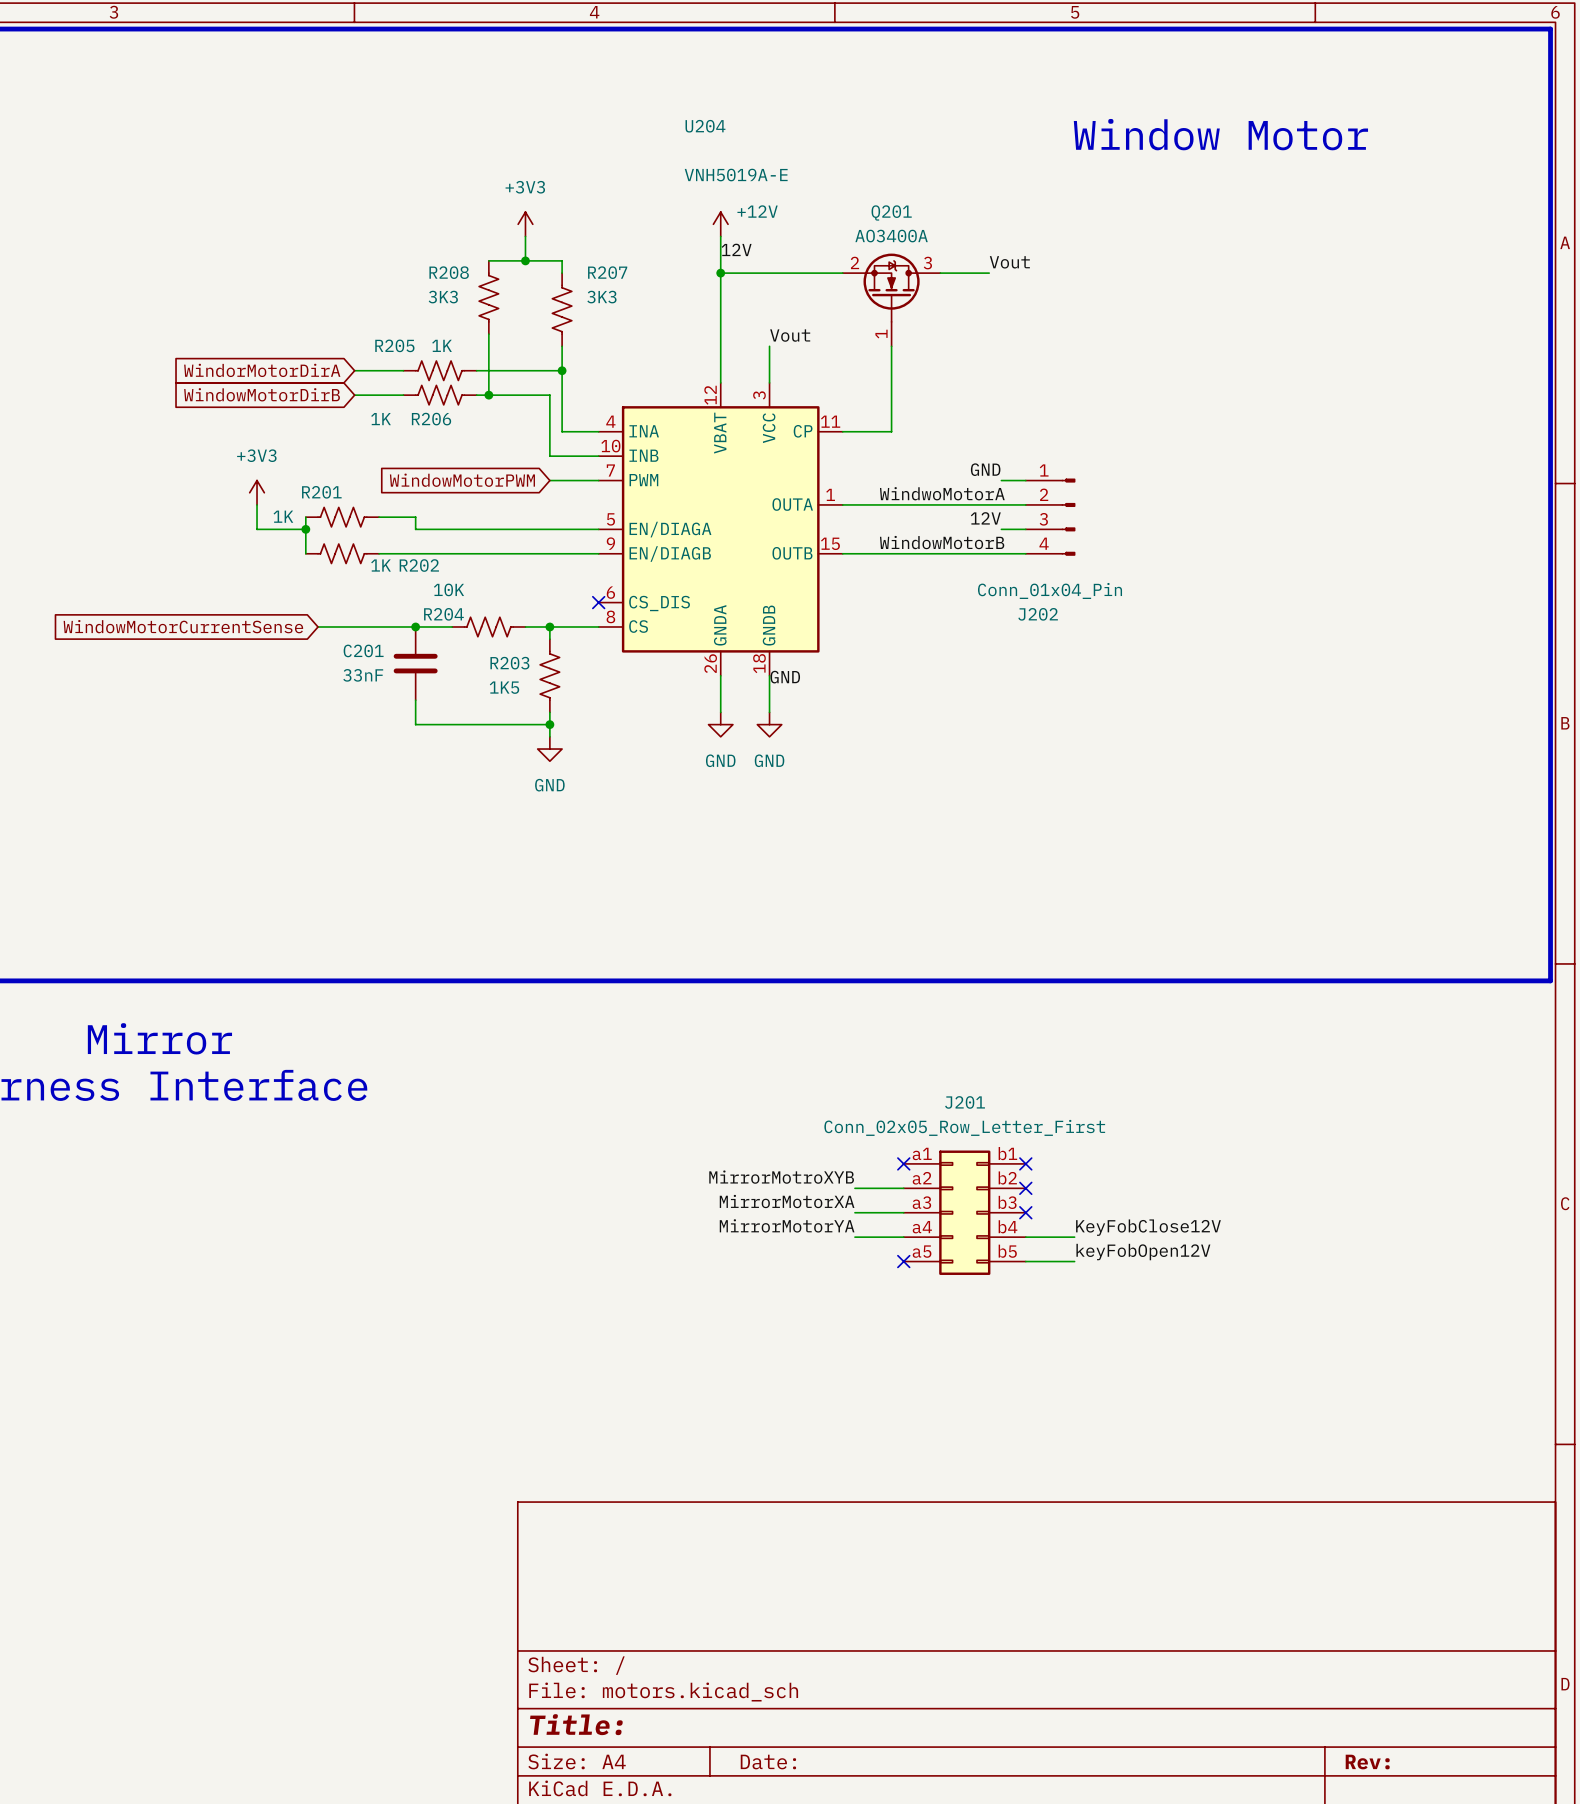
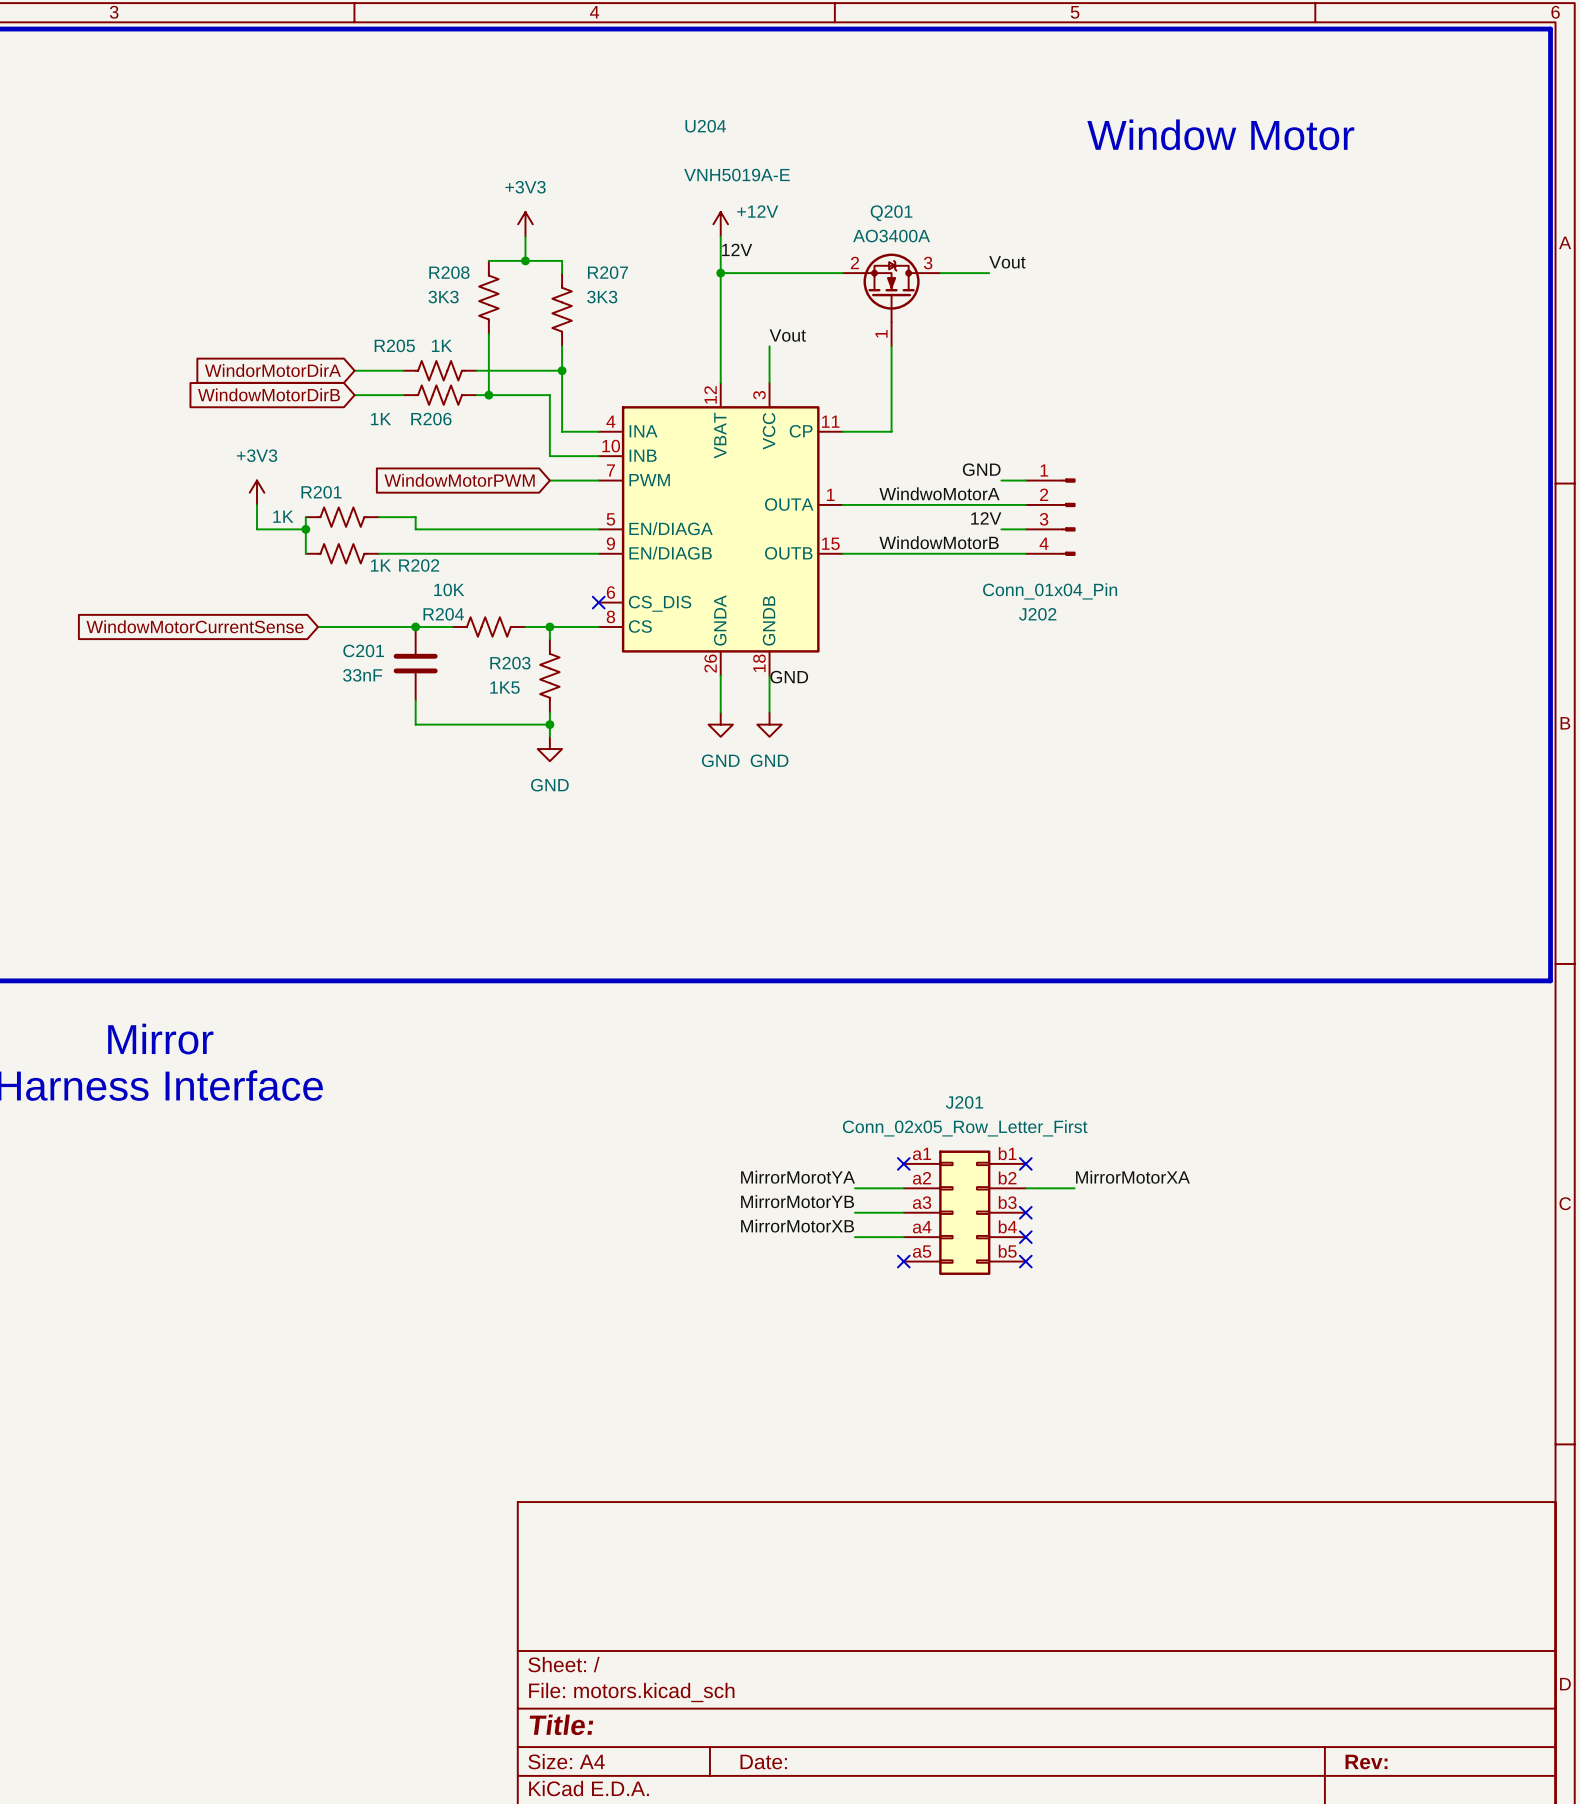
label: MirrorMotroXYB (781, 1177) -> MirrorMorotYA (798, 1177)
label: none -> MirrorMotorXA (1132, 1177)
no-connect mark: (1025, 1188) -> none
label: MirrorMotorXA (787, 1201) -> MirrorMotorYB (797, 1201)
label: MirrorMotorYA (787, 1225) -> MirrorMotorXB (797, 1226)
label: KeyFobClose12V (1148, 1227) -> none
wire: (1025, 1237) (1074, 1237) -> (1025, 1188) (1074, 1188)
no-connect mark: none -> (1025, 1237)
label: keyFobOpen12V (1143, 1252) -> none
wire: (1025, 1261) (1074, 1261) -> none
no-connect mark: none -> (1025, 1261)

